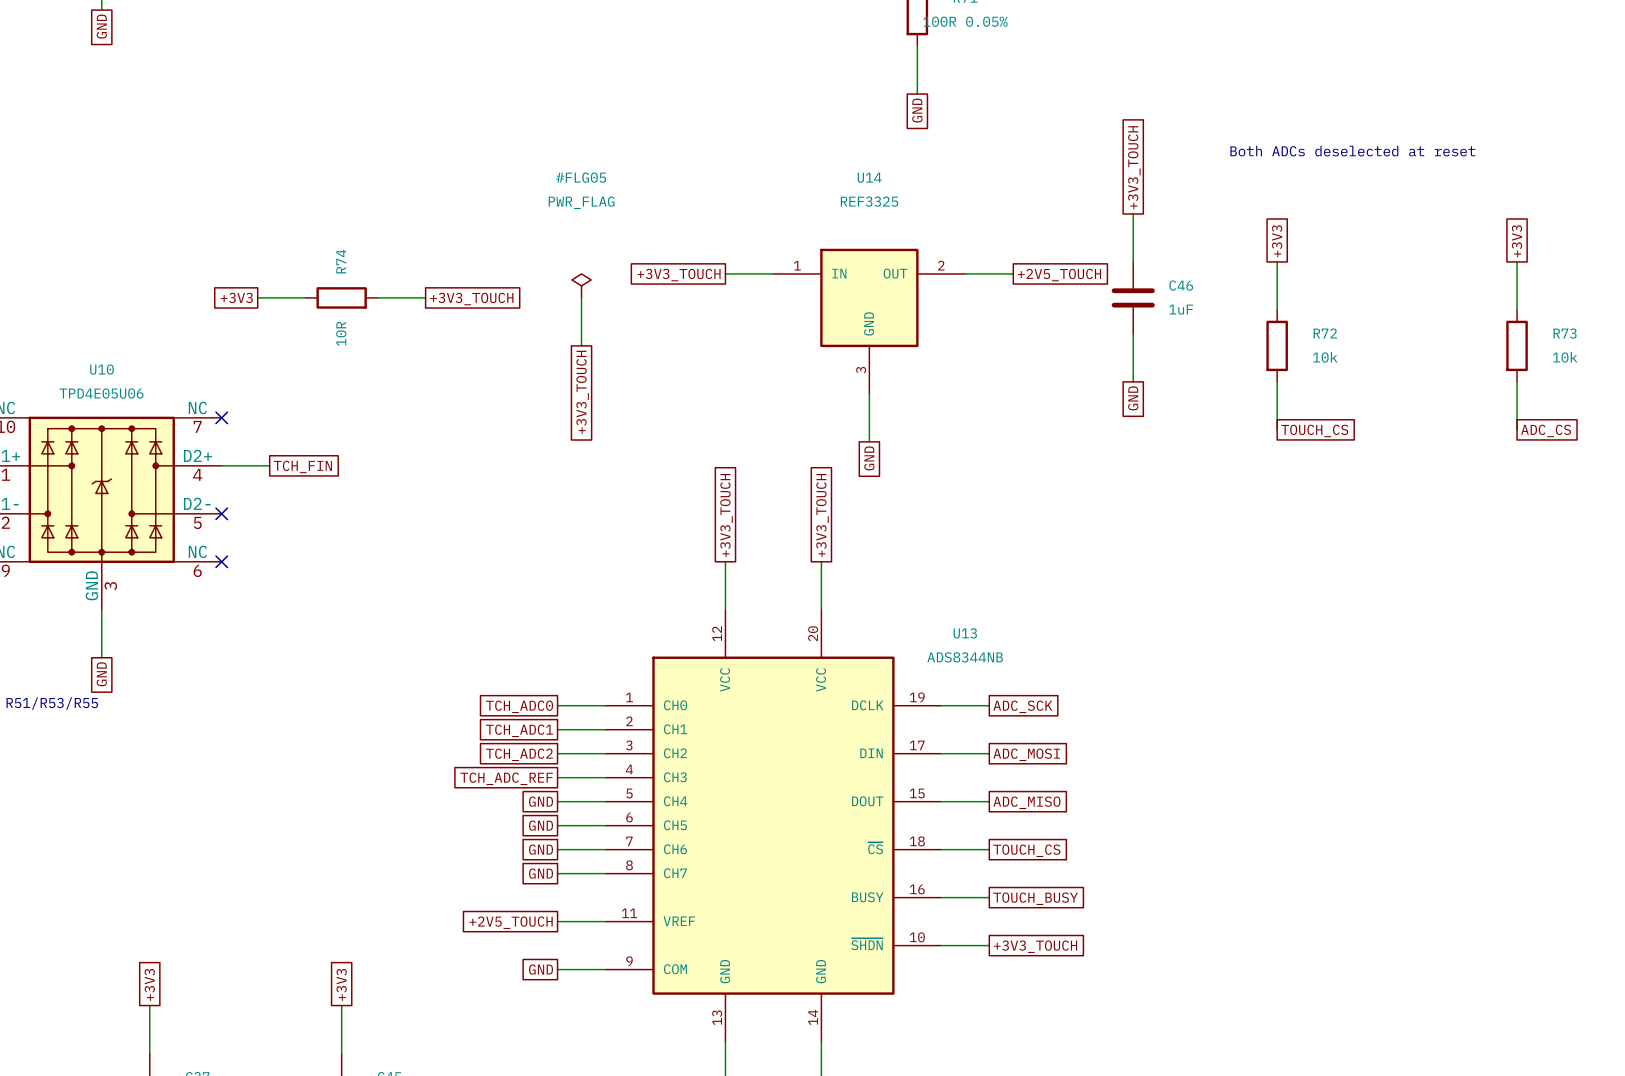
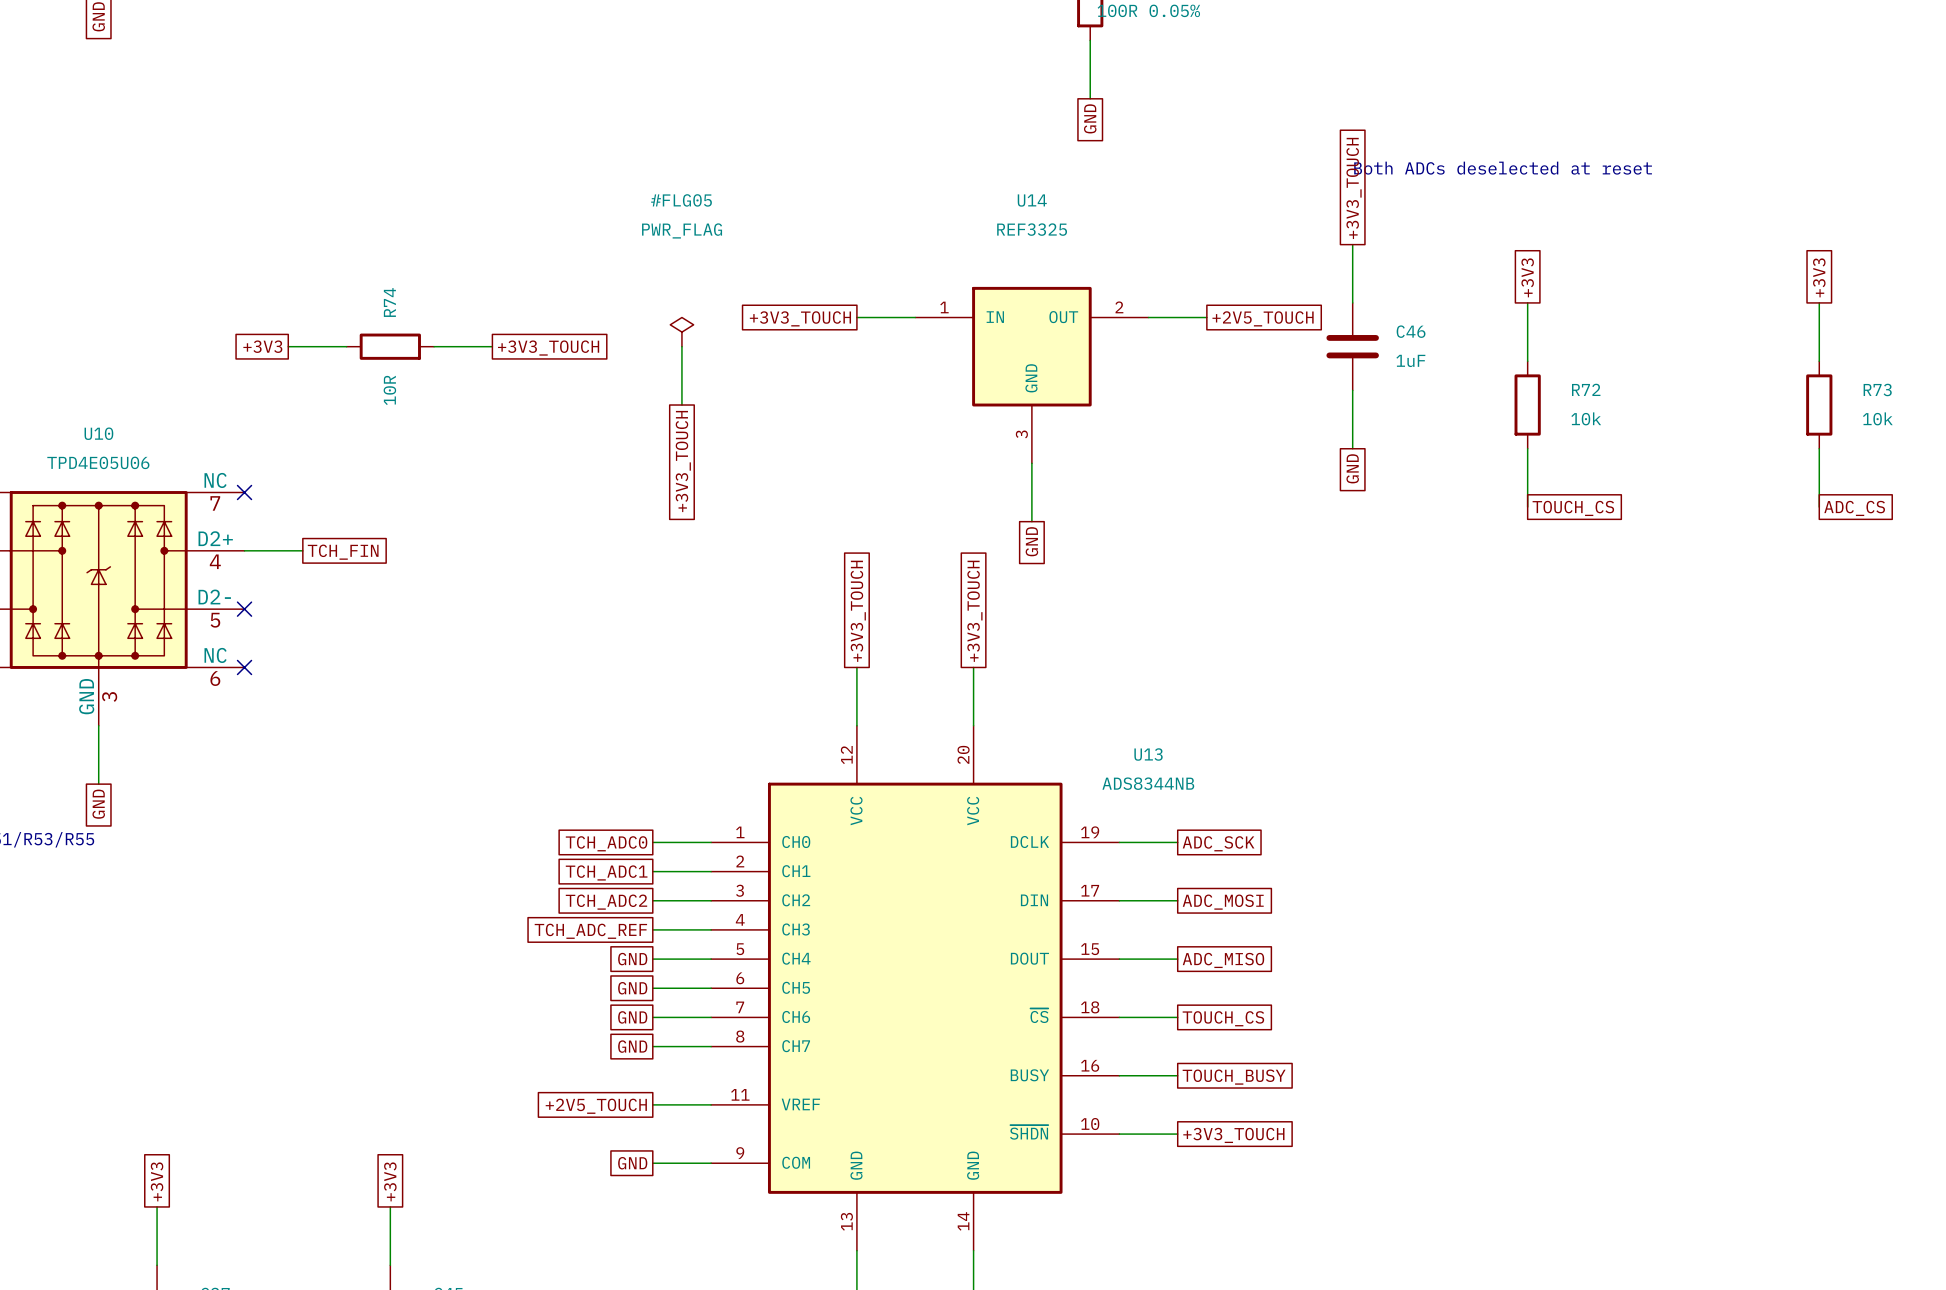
text position: Both ADCs deselected at reset (1352, 151) -> Both ADCs deselected at reset (1503, 168)

